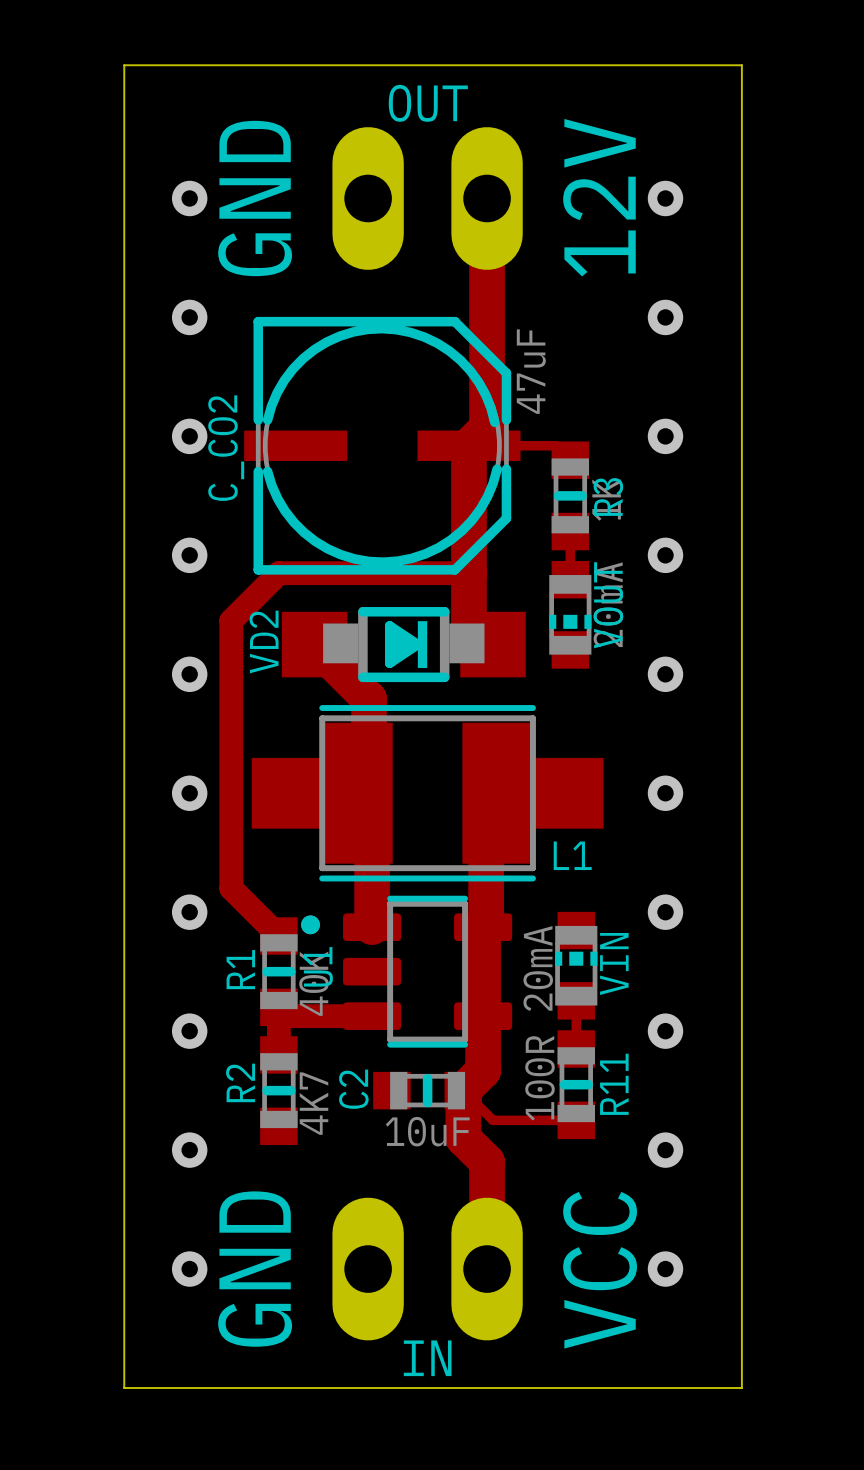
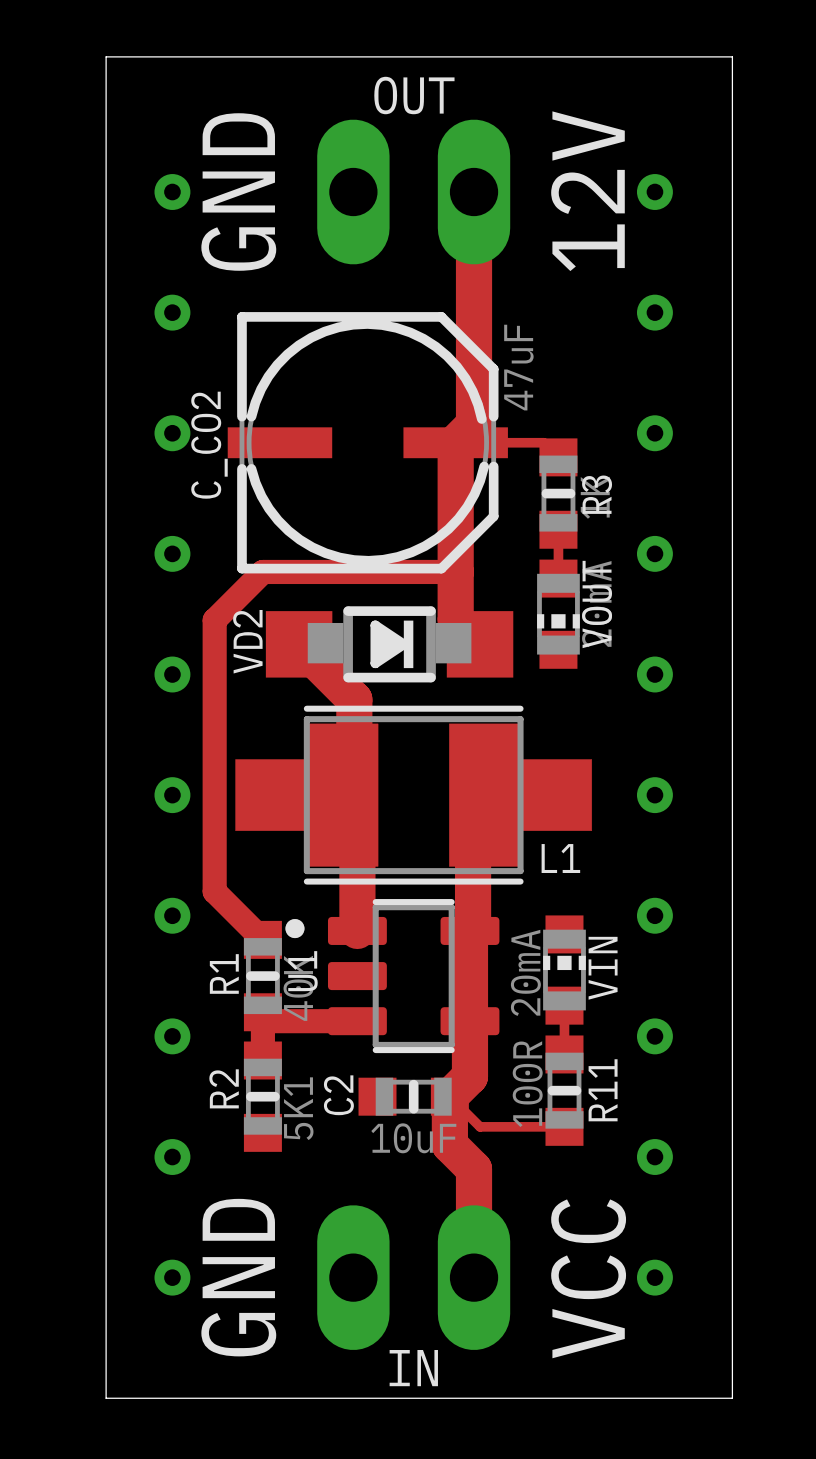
R2 value: 4K7 (313, 1103) -> 5K1 (298, 1108)

